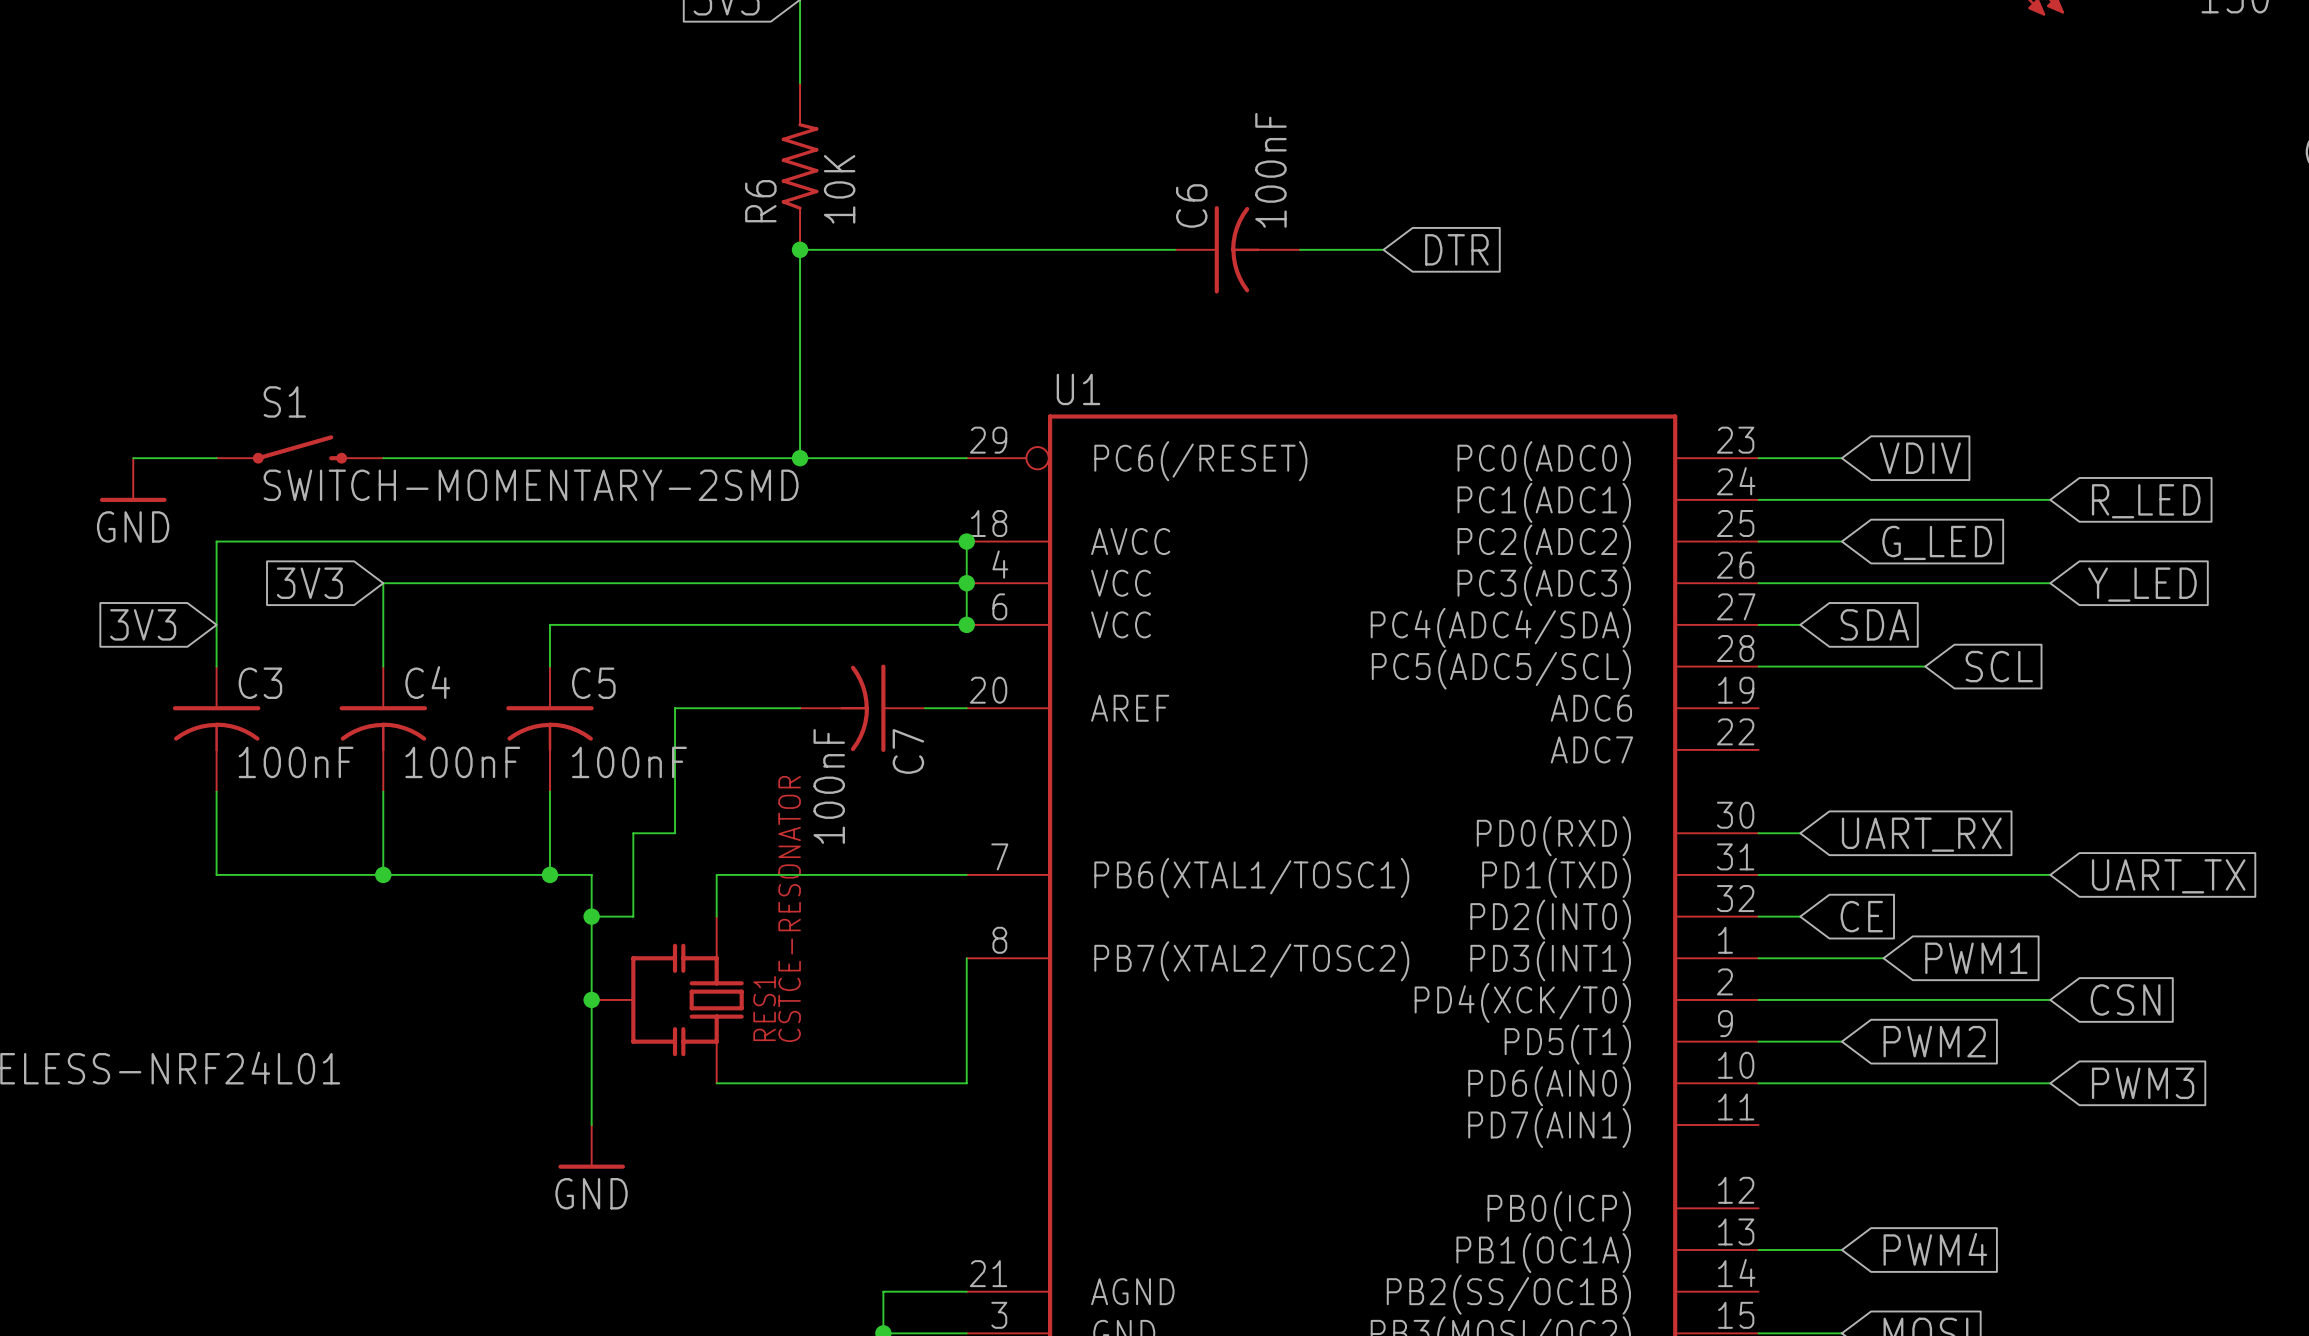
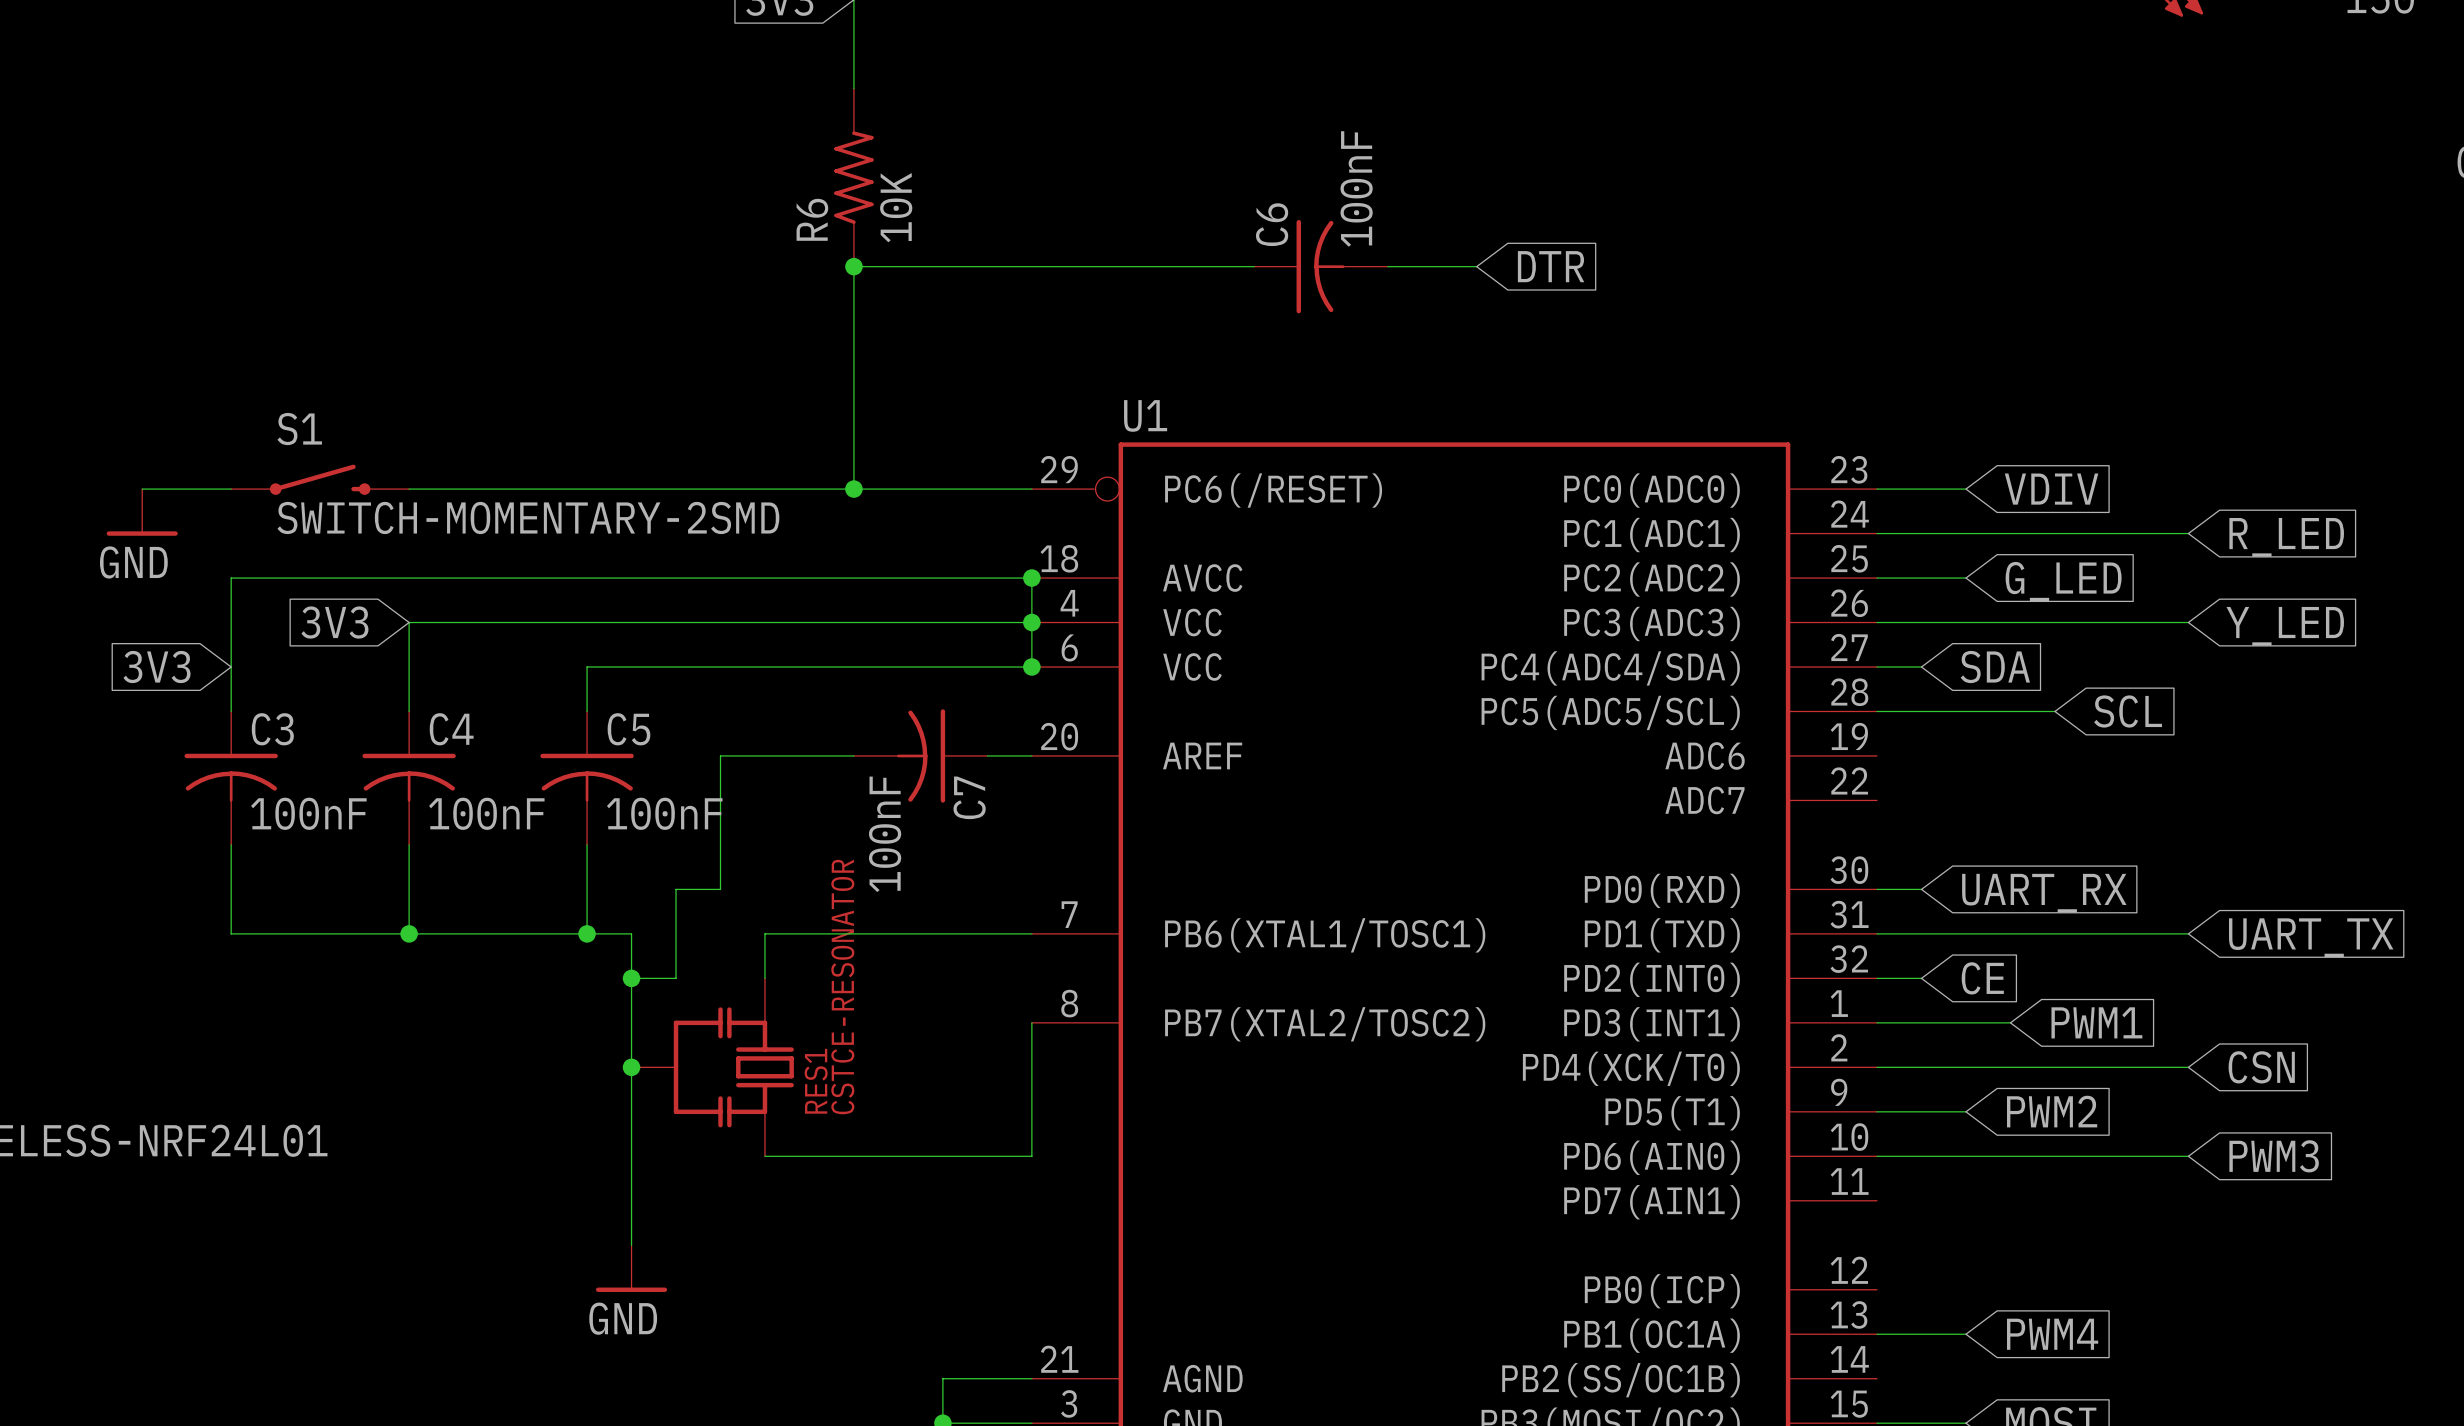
power symbol position: GND (591, 1146) -> GND (631, 1268)

